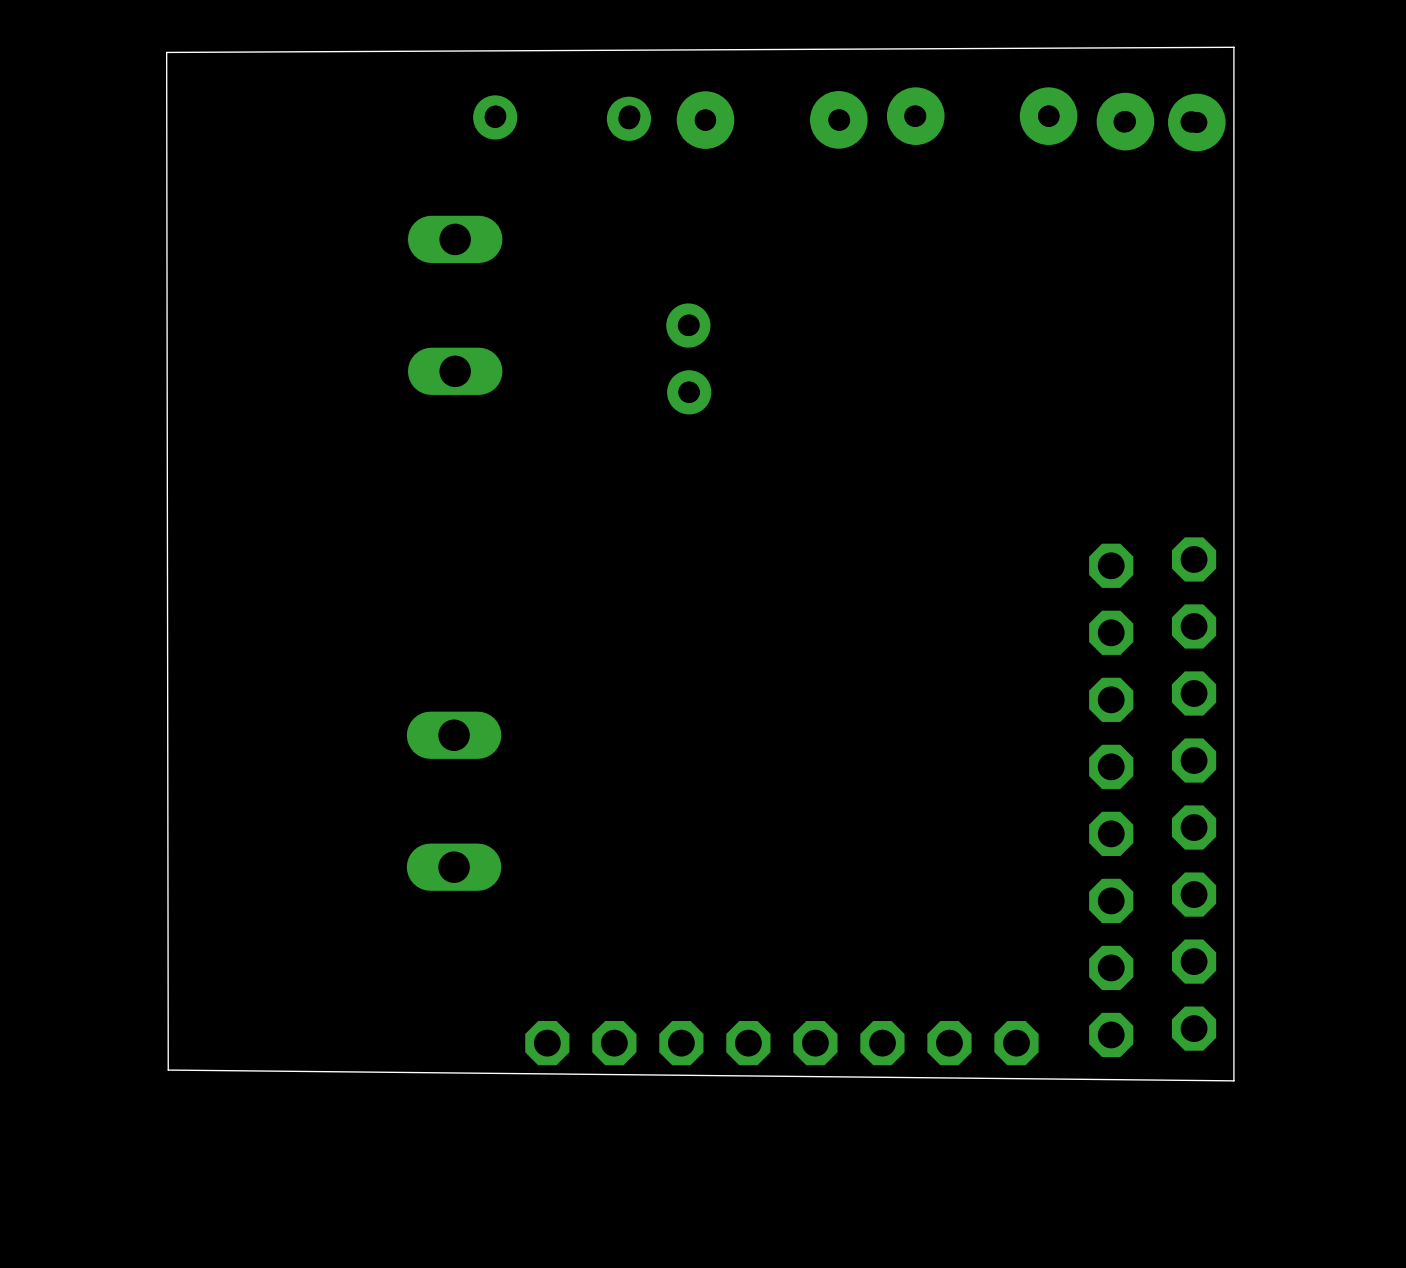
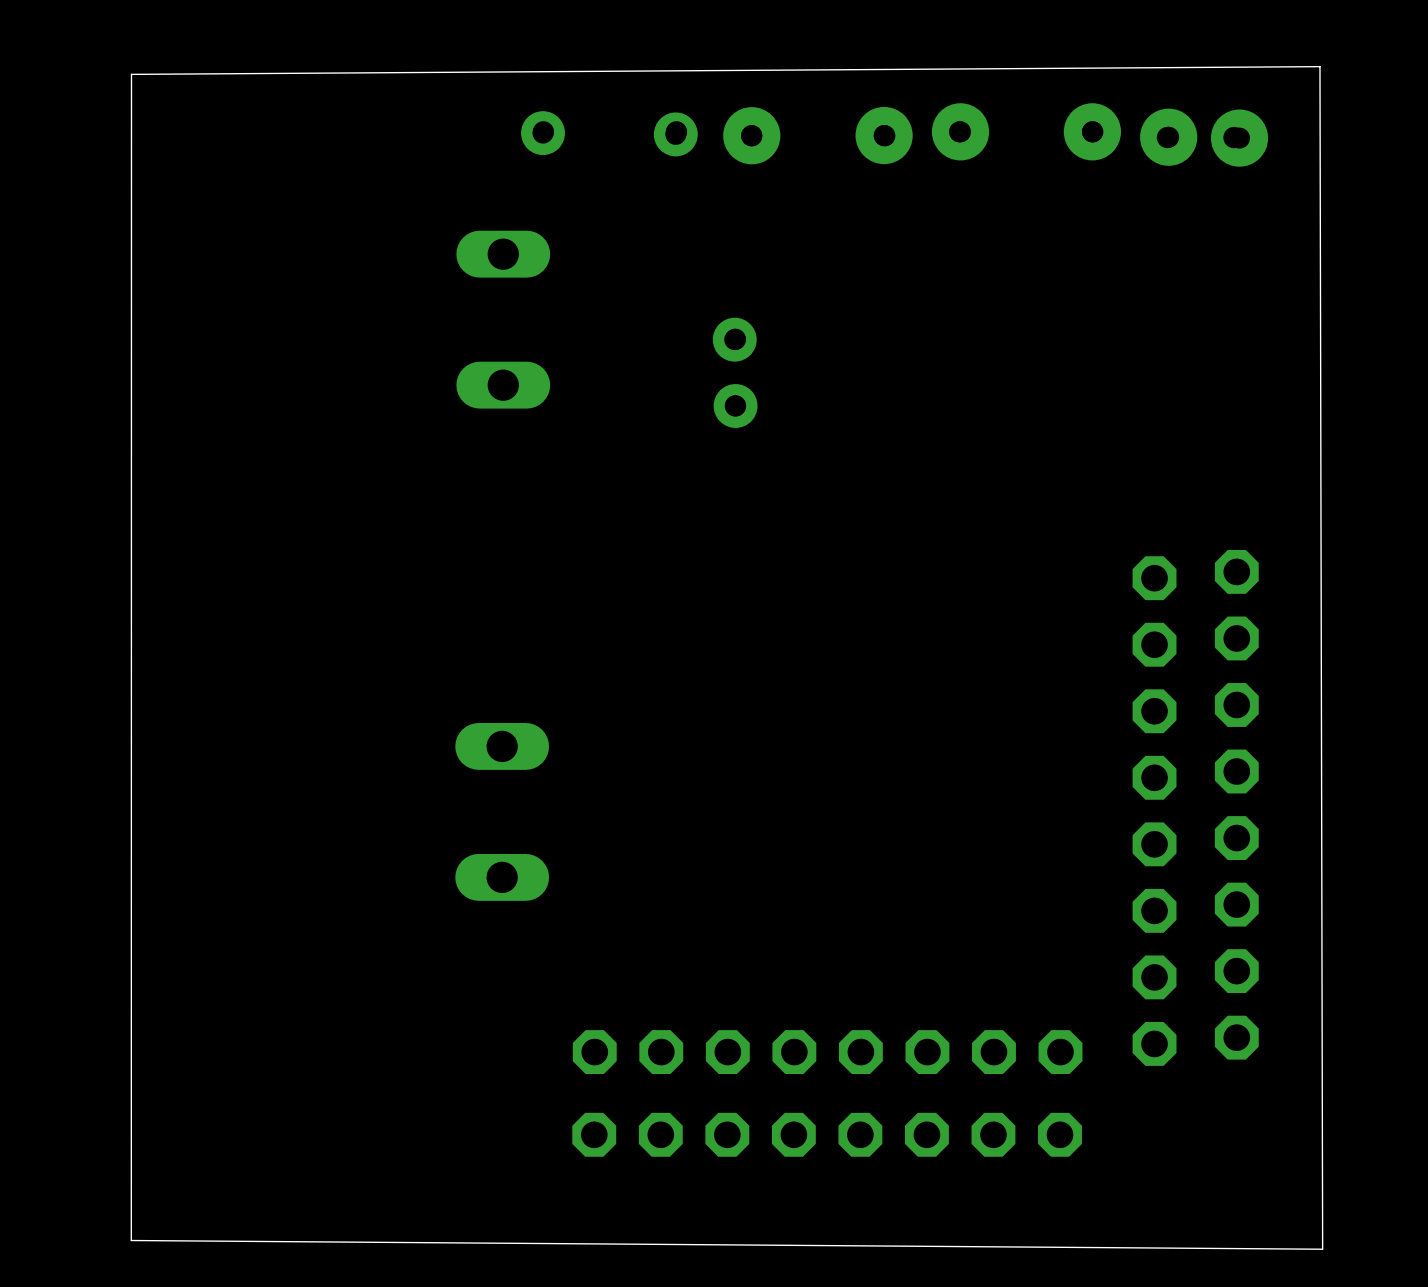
board edge: (1233, 47) (166, 52) (168, 1070) (1233, 1080) (1233, 47) -> (1319, 66) (1322, 1249) (131, 1240) (131, 74) (1319, 66)
part: none -> (827, 1134)

